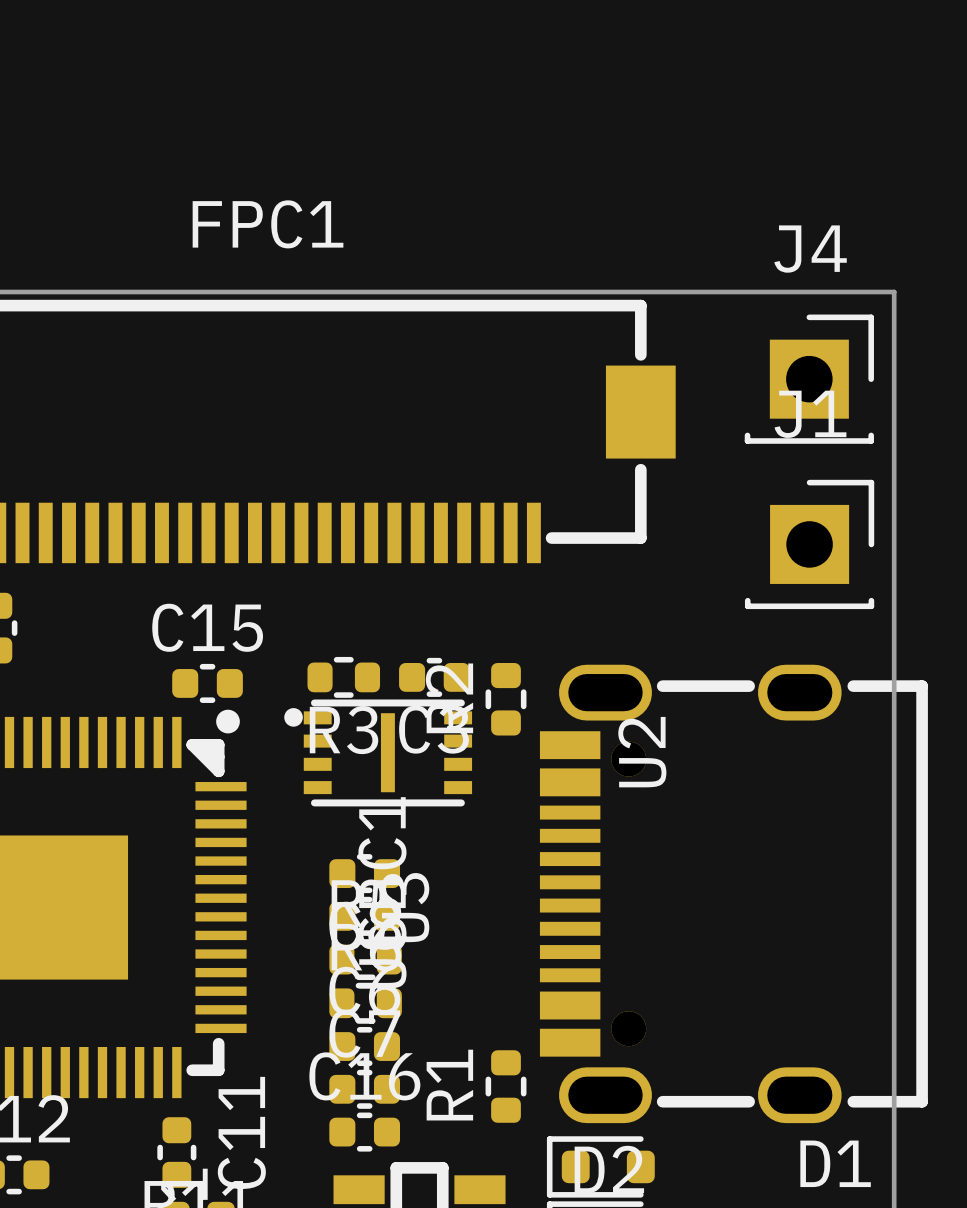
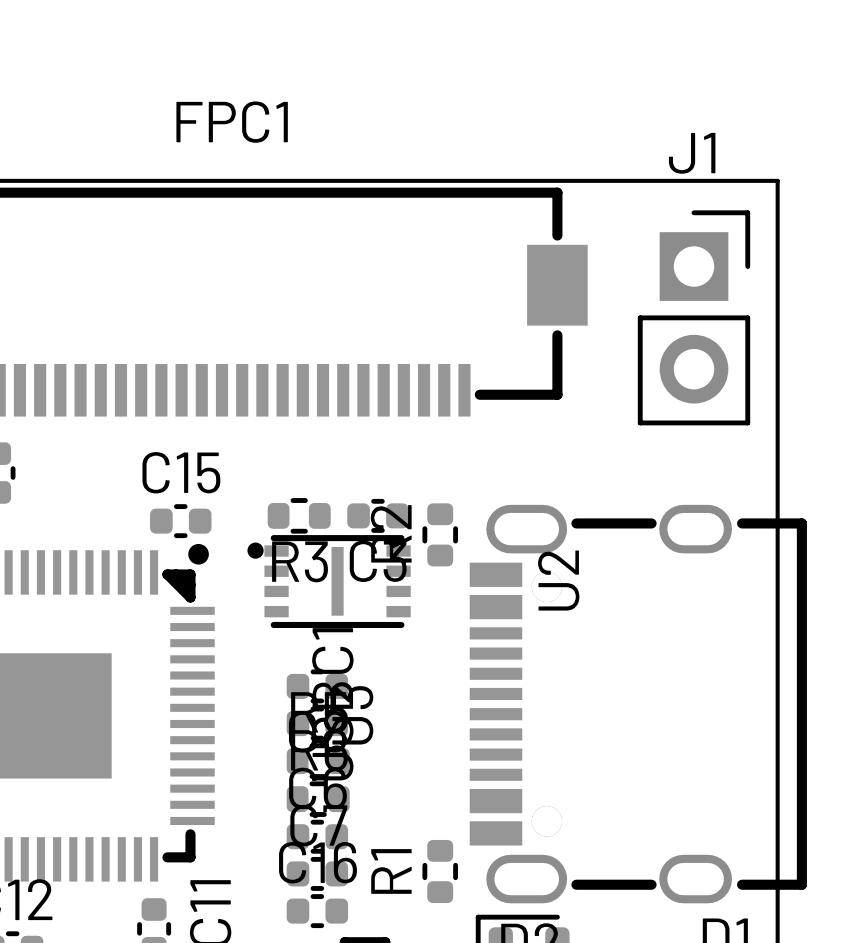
J4: (809, 379) -> none
J1 footprint: [744, 479, 875, 610] -> [637, 210, 751, 426]

